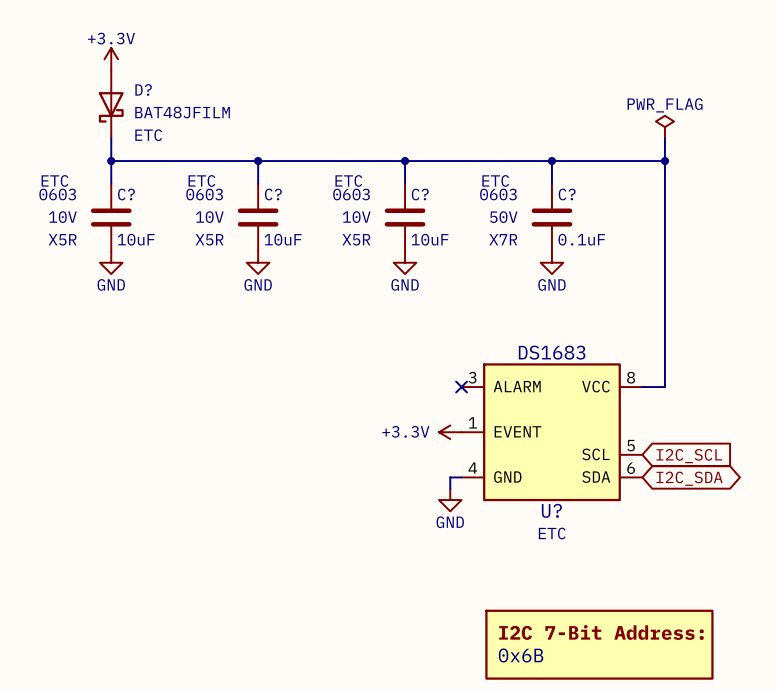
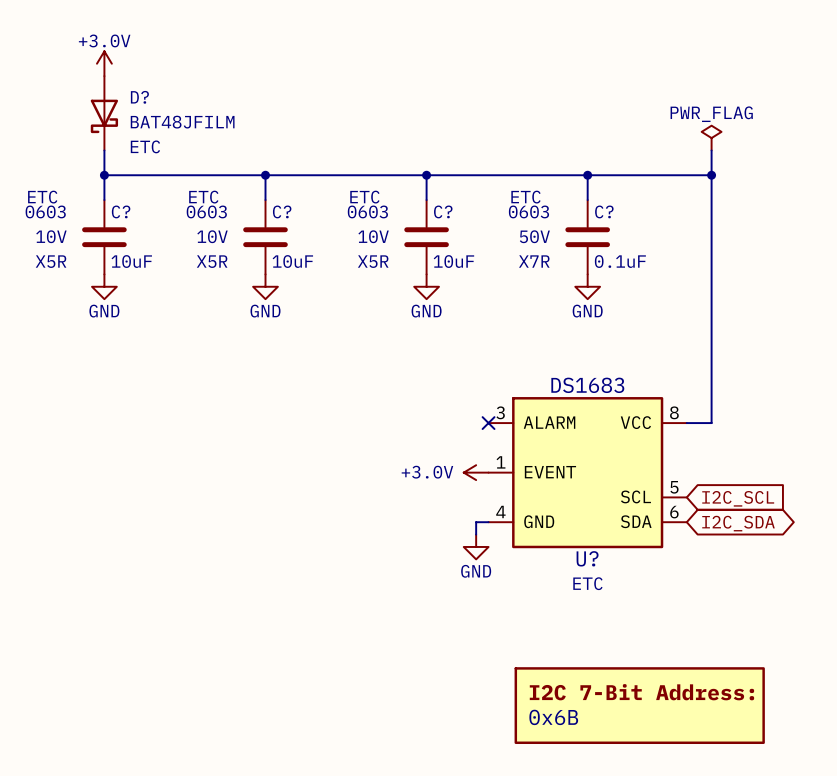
power symbol: +3.3V (111, 59) -> +3.0V (104, 63)
power symbol: +3.3V (450, 432) -> +3.0V (476, 472)

